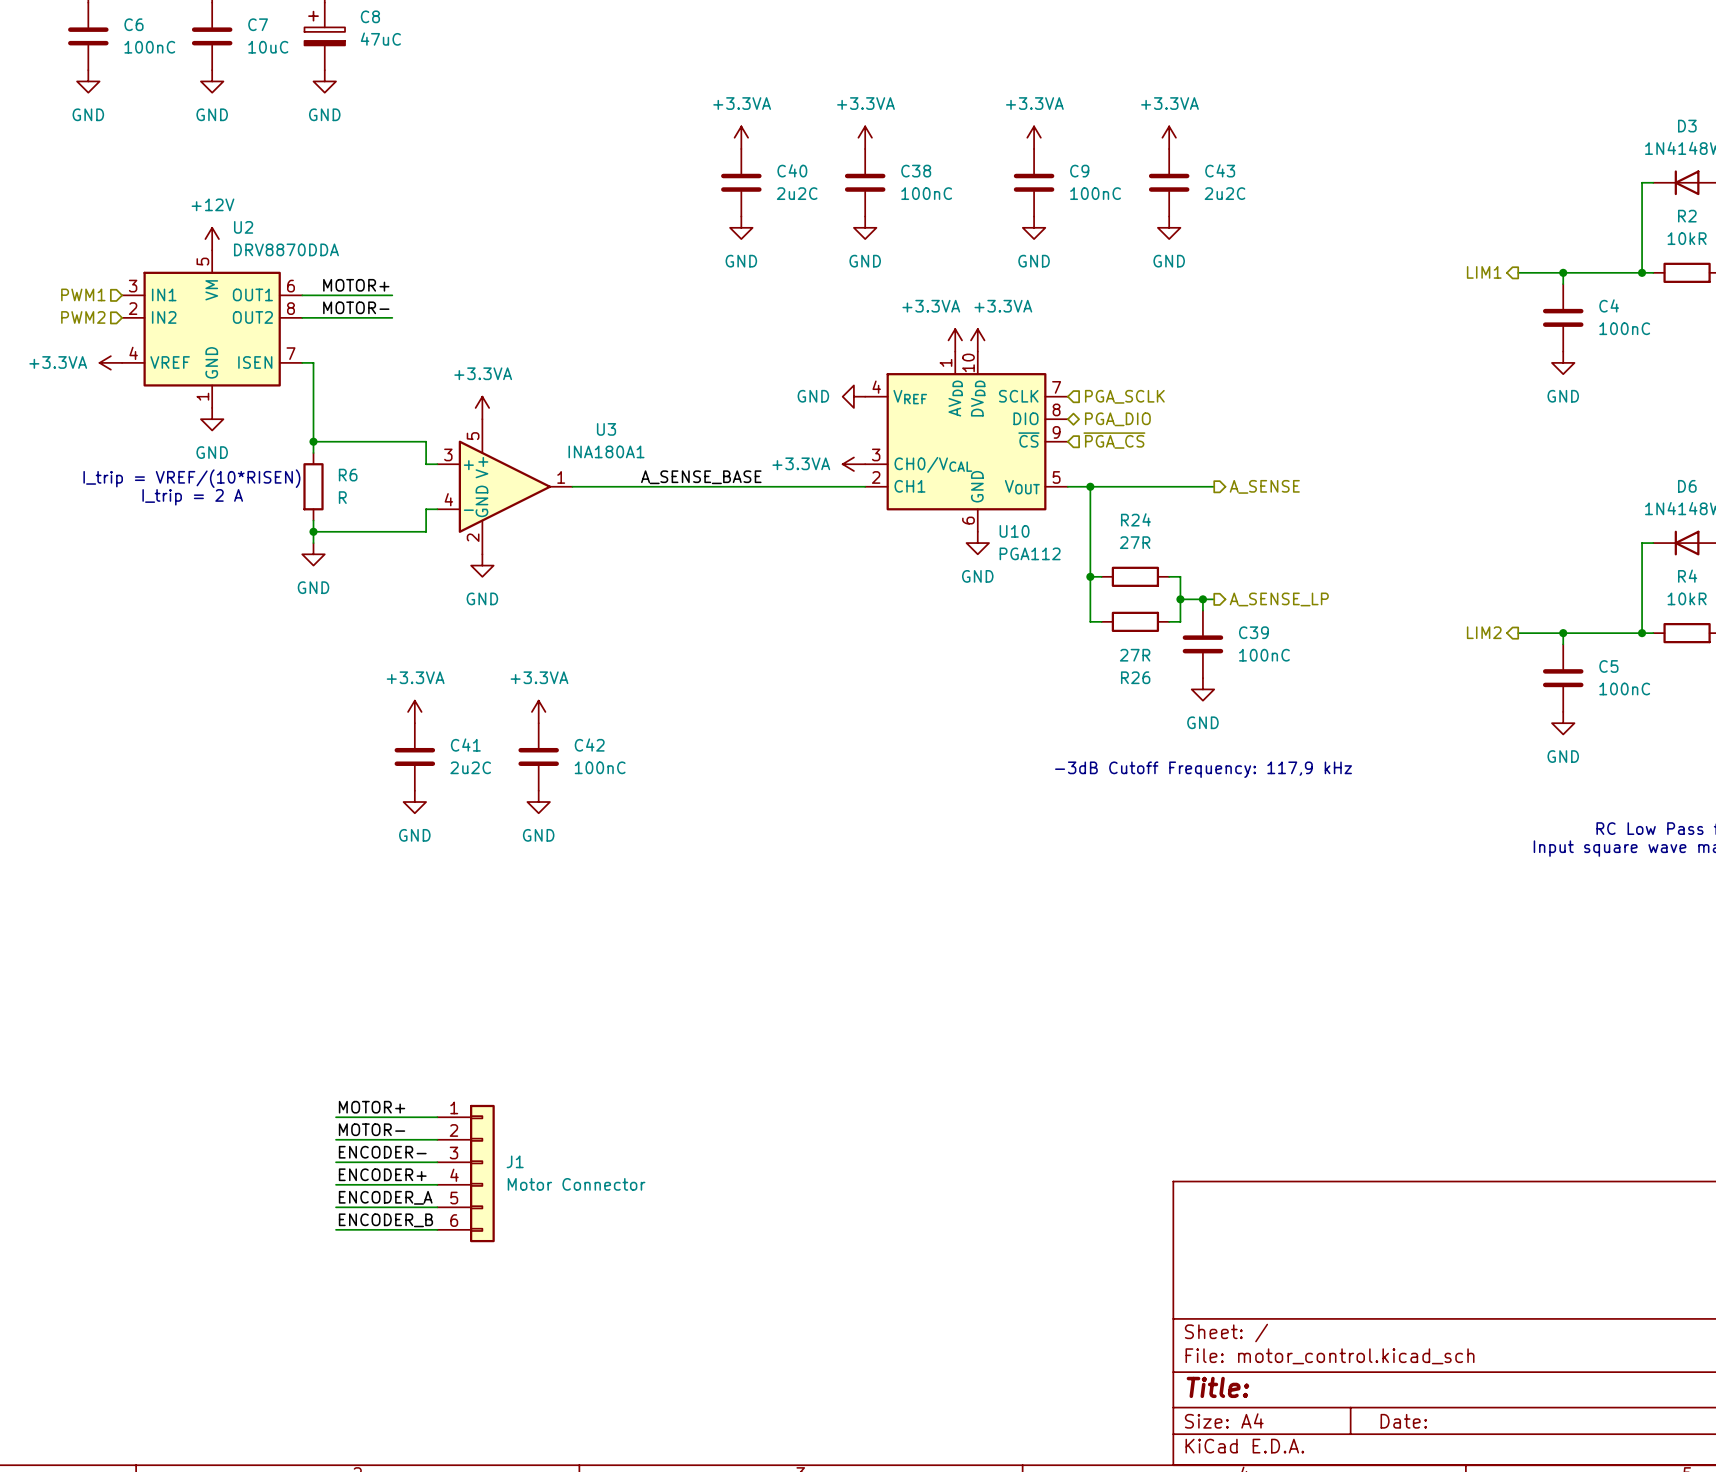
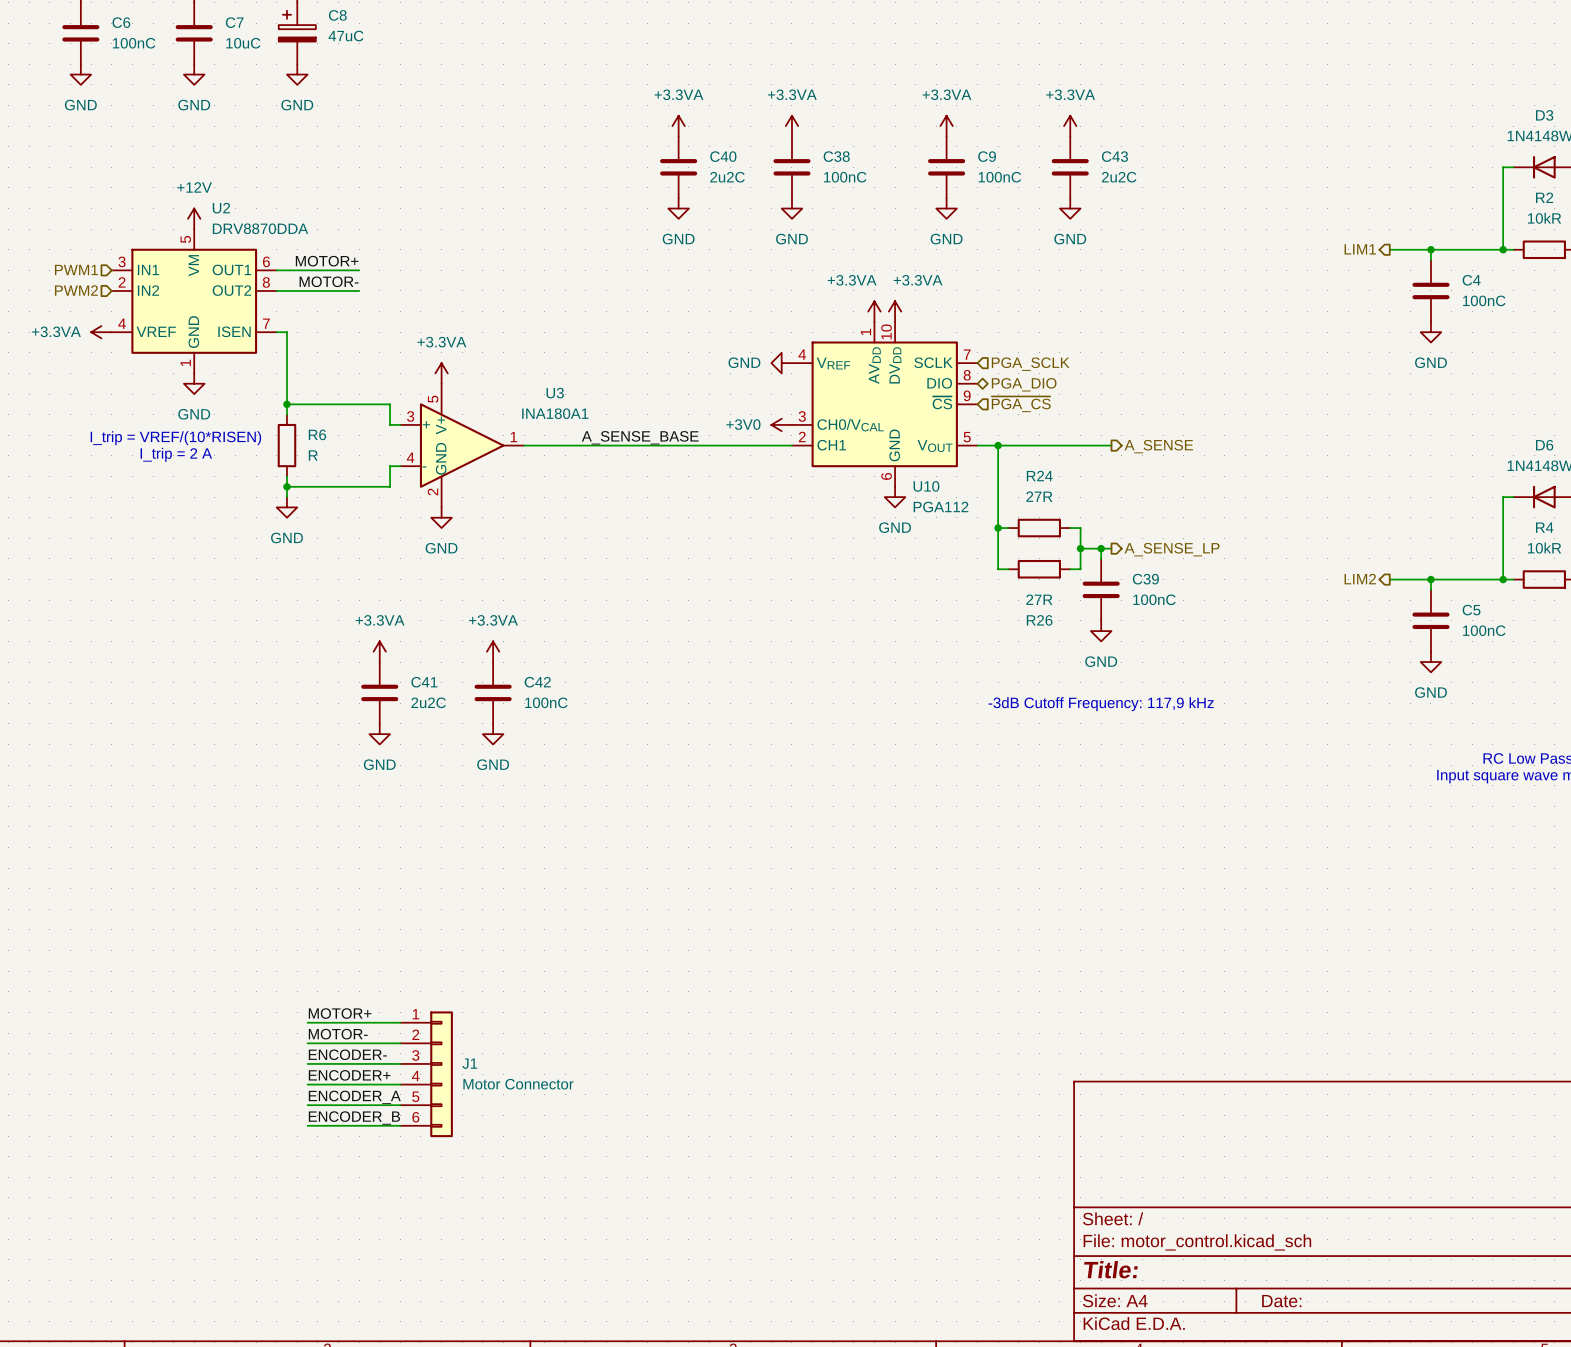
power symbol: +3.3VA (853, 464) -> +3V0 (781, 424)

